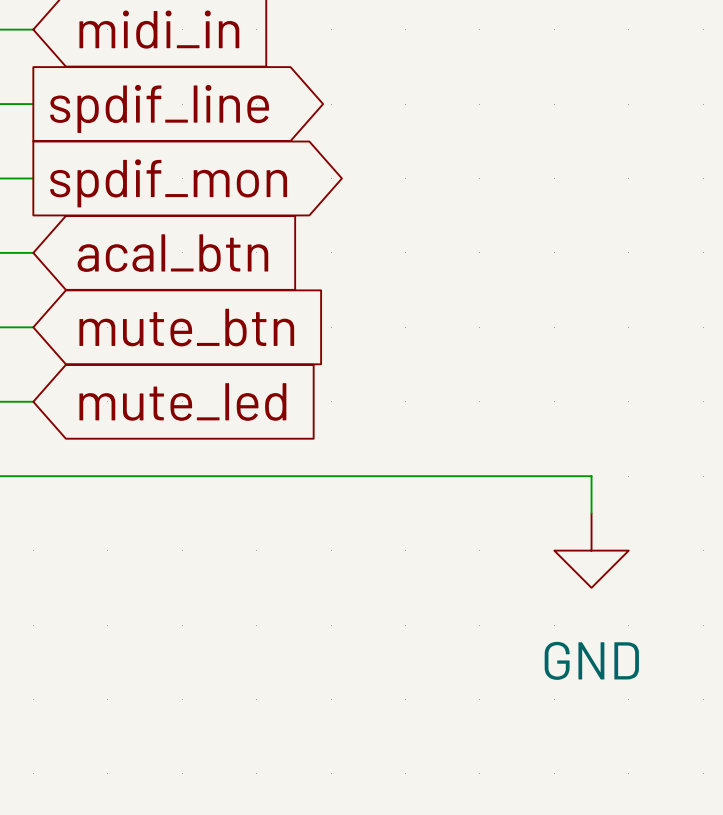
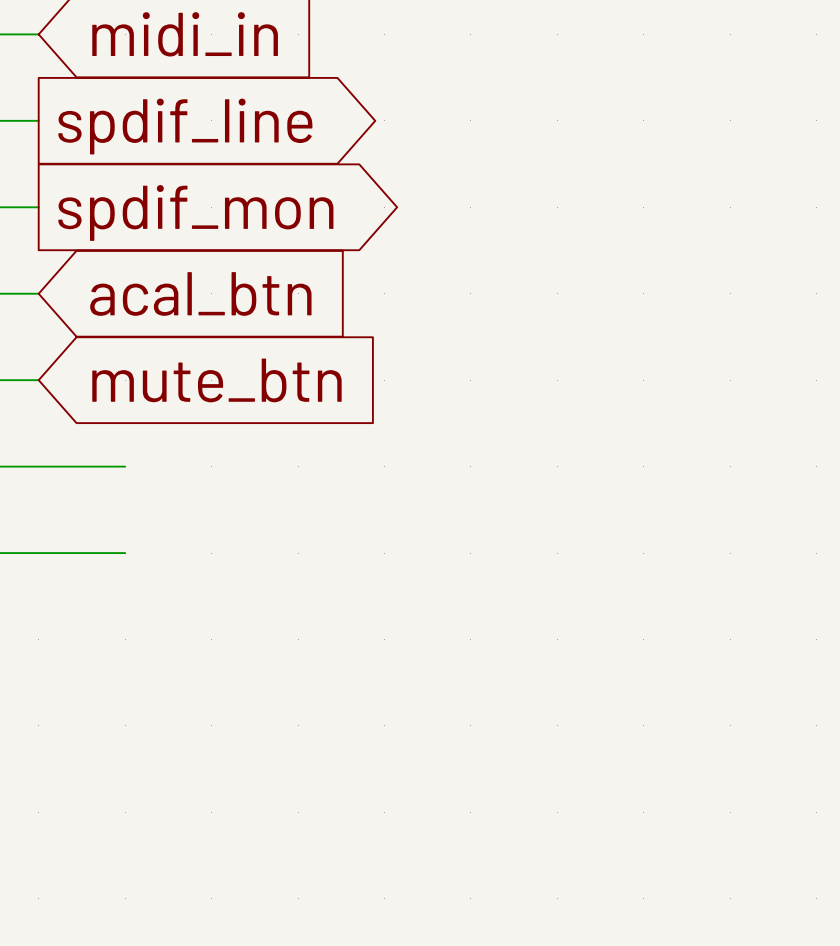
wire: none -> (38, 466) (125, 466)
global label: mute_led (182, 402) -> none
wire: (107, 476) (591, 476) (591, 513) -> none
power symbol: GND (591, 550) -> none

